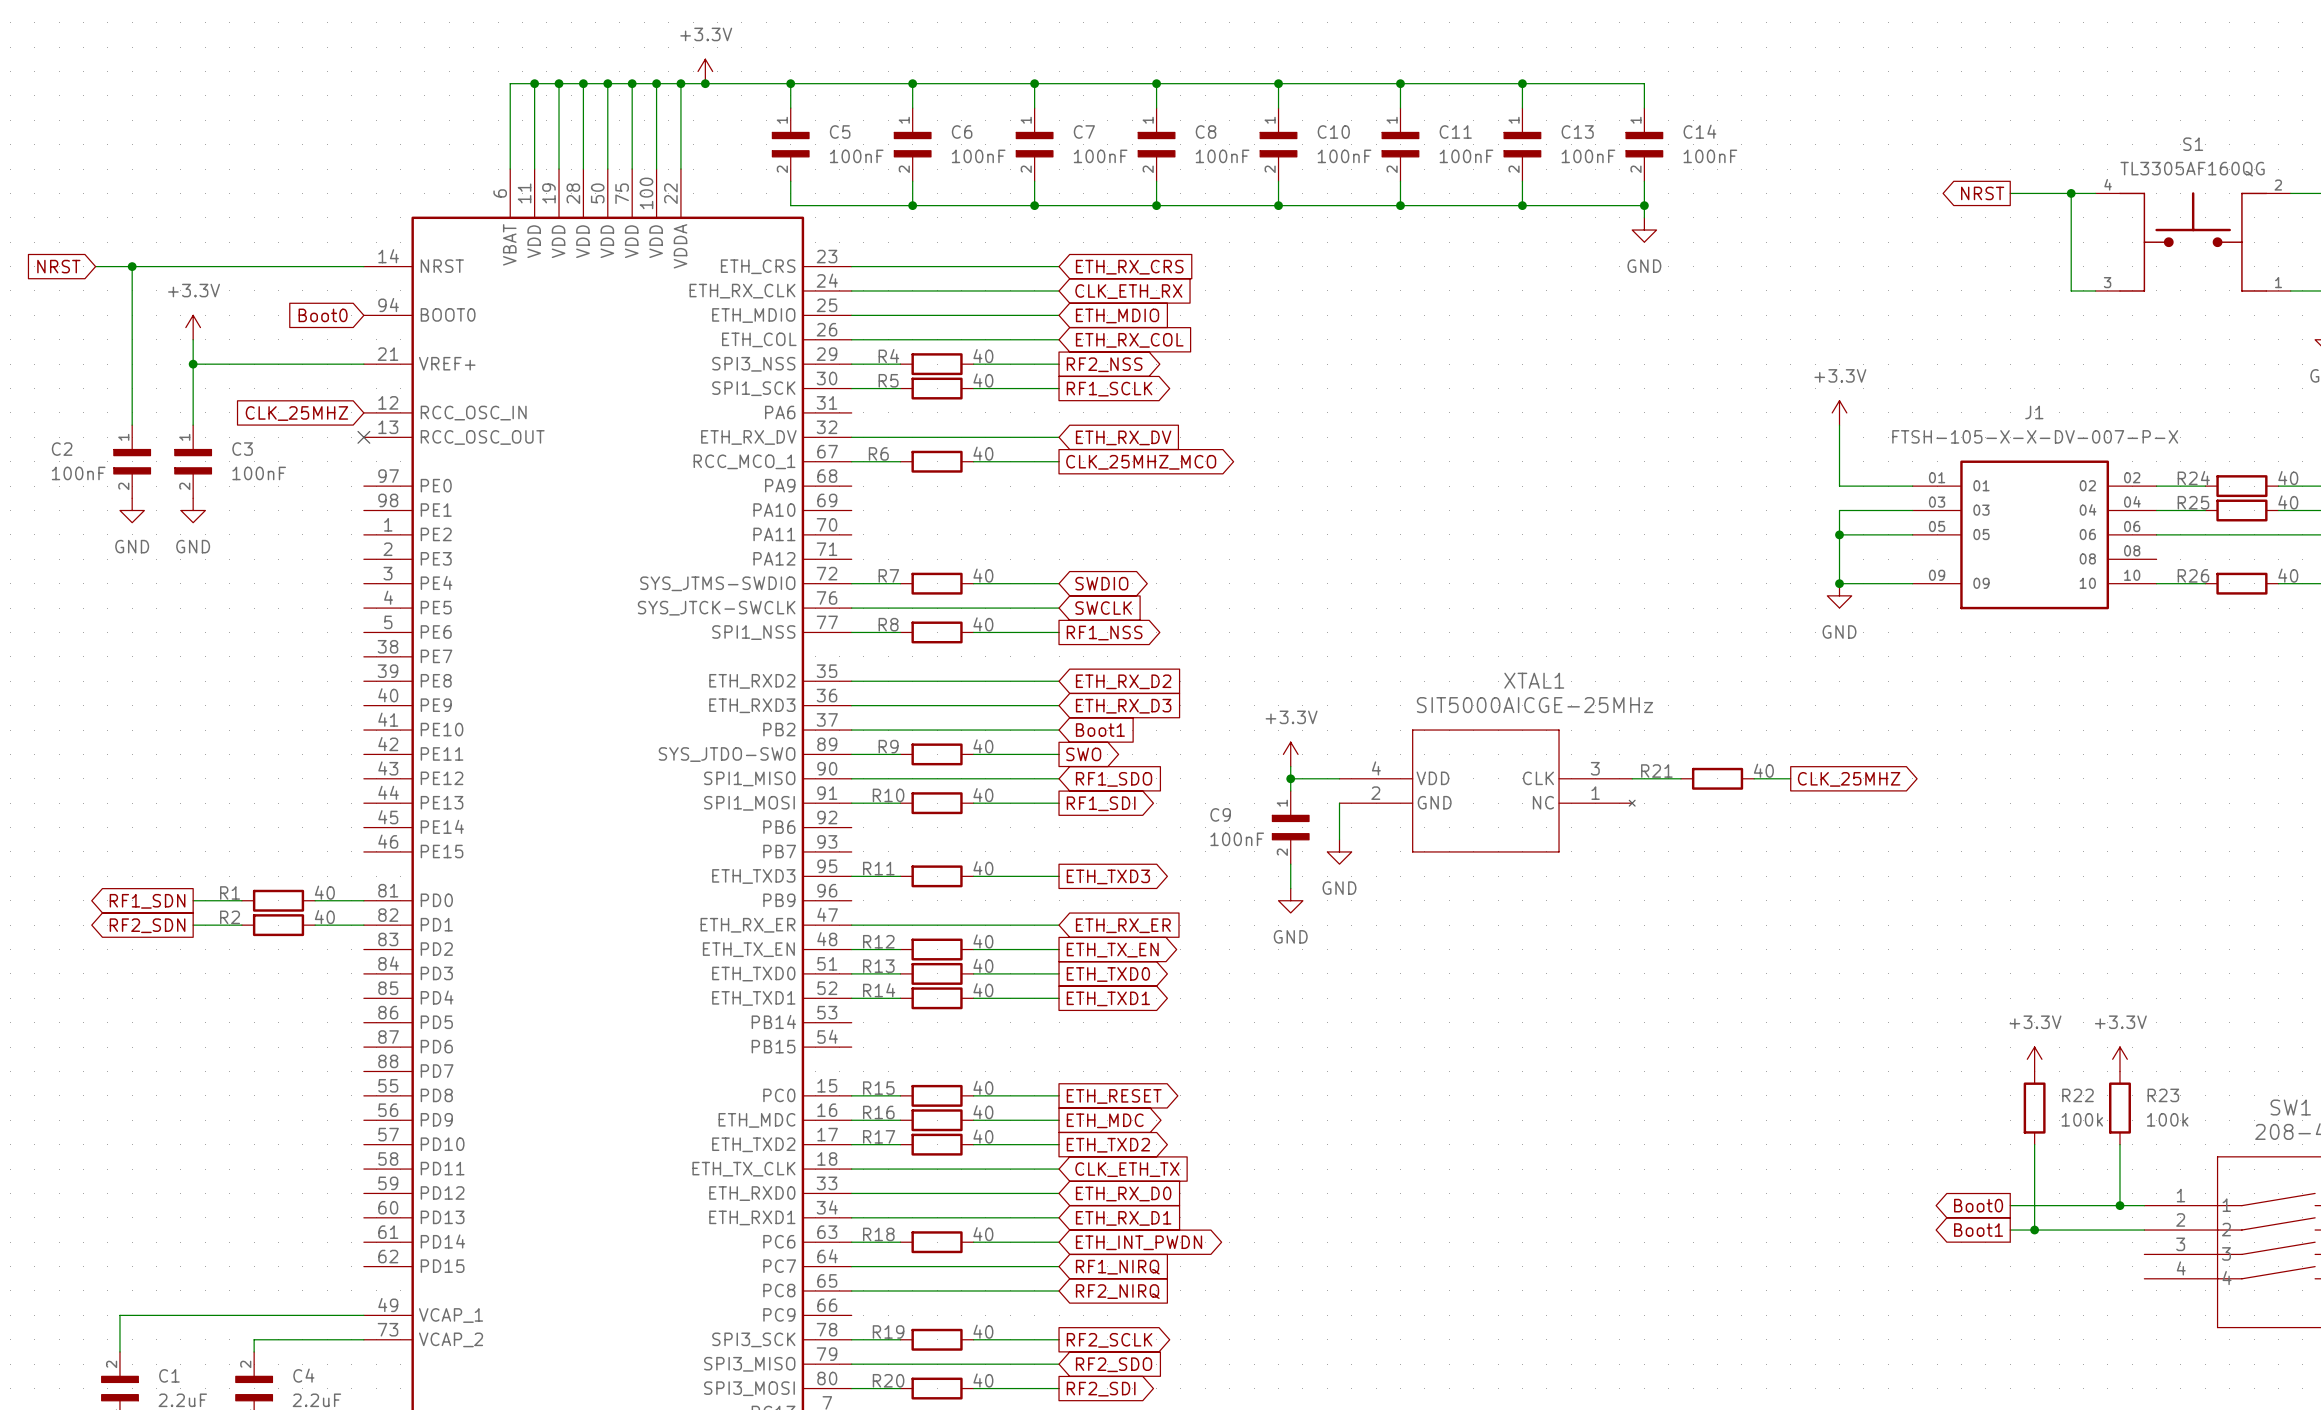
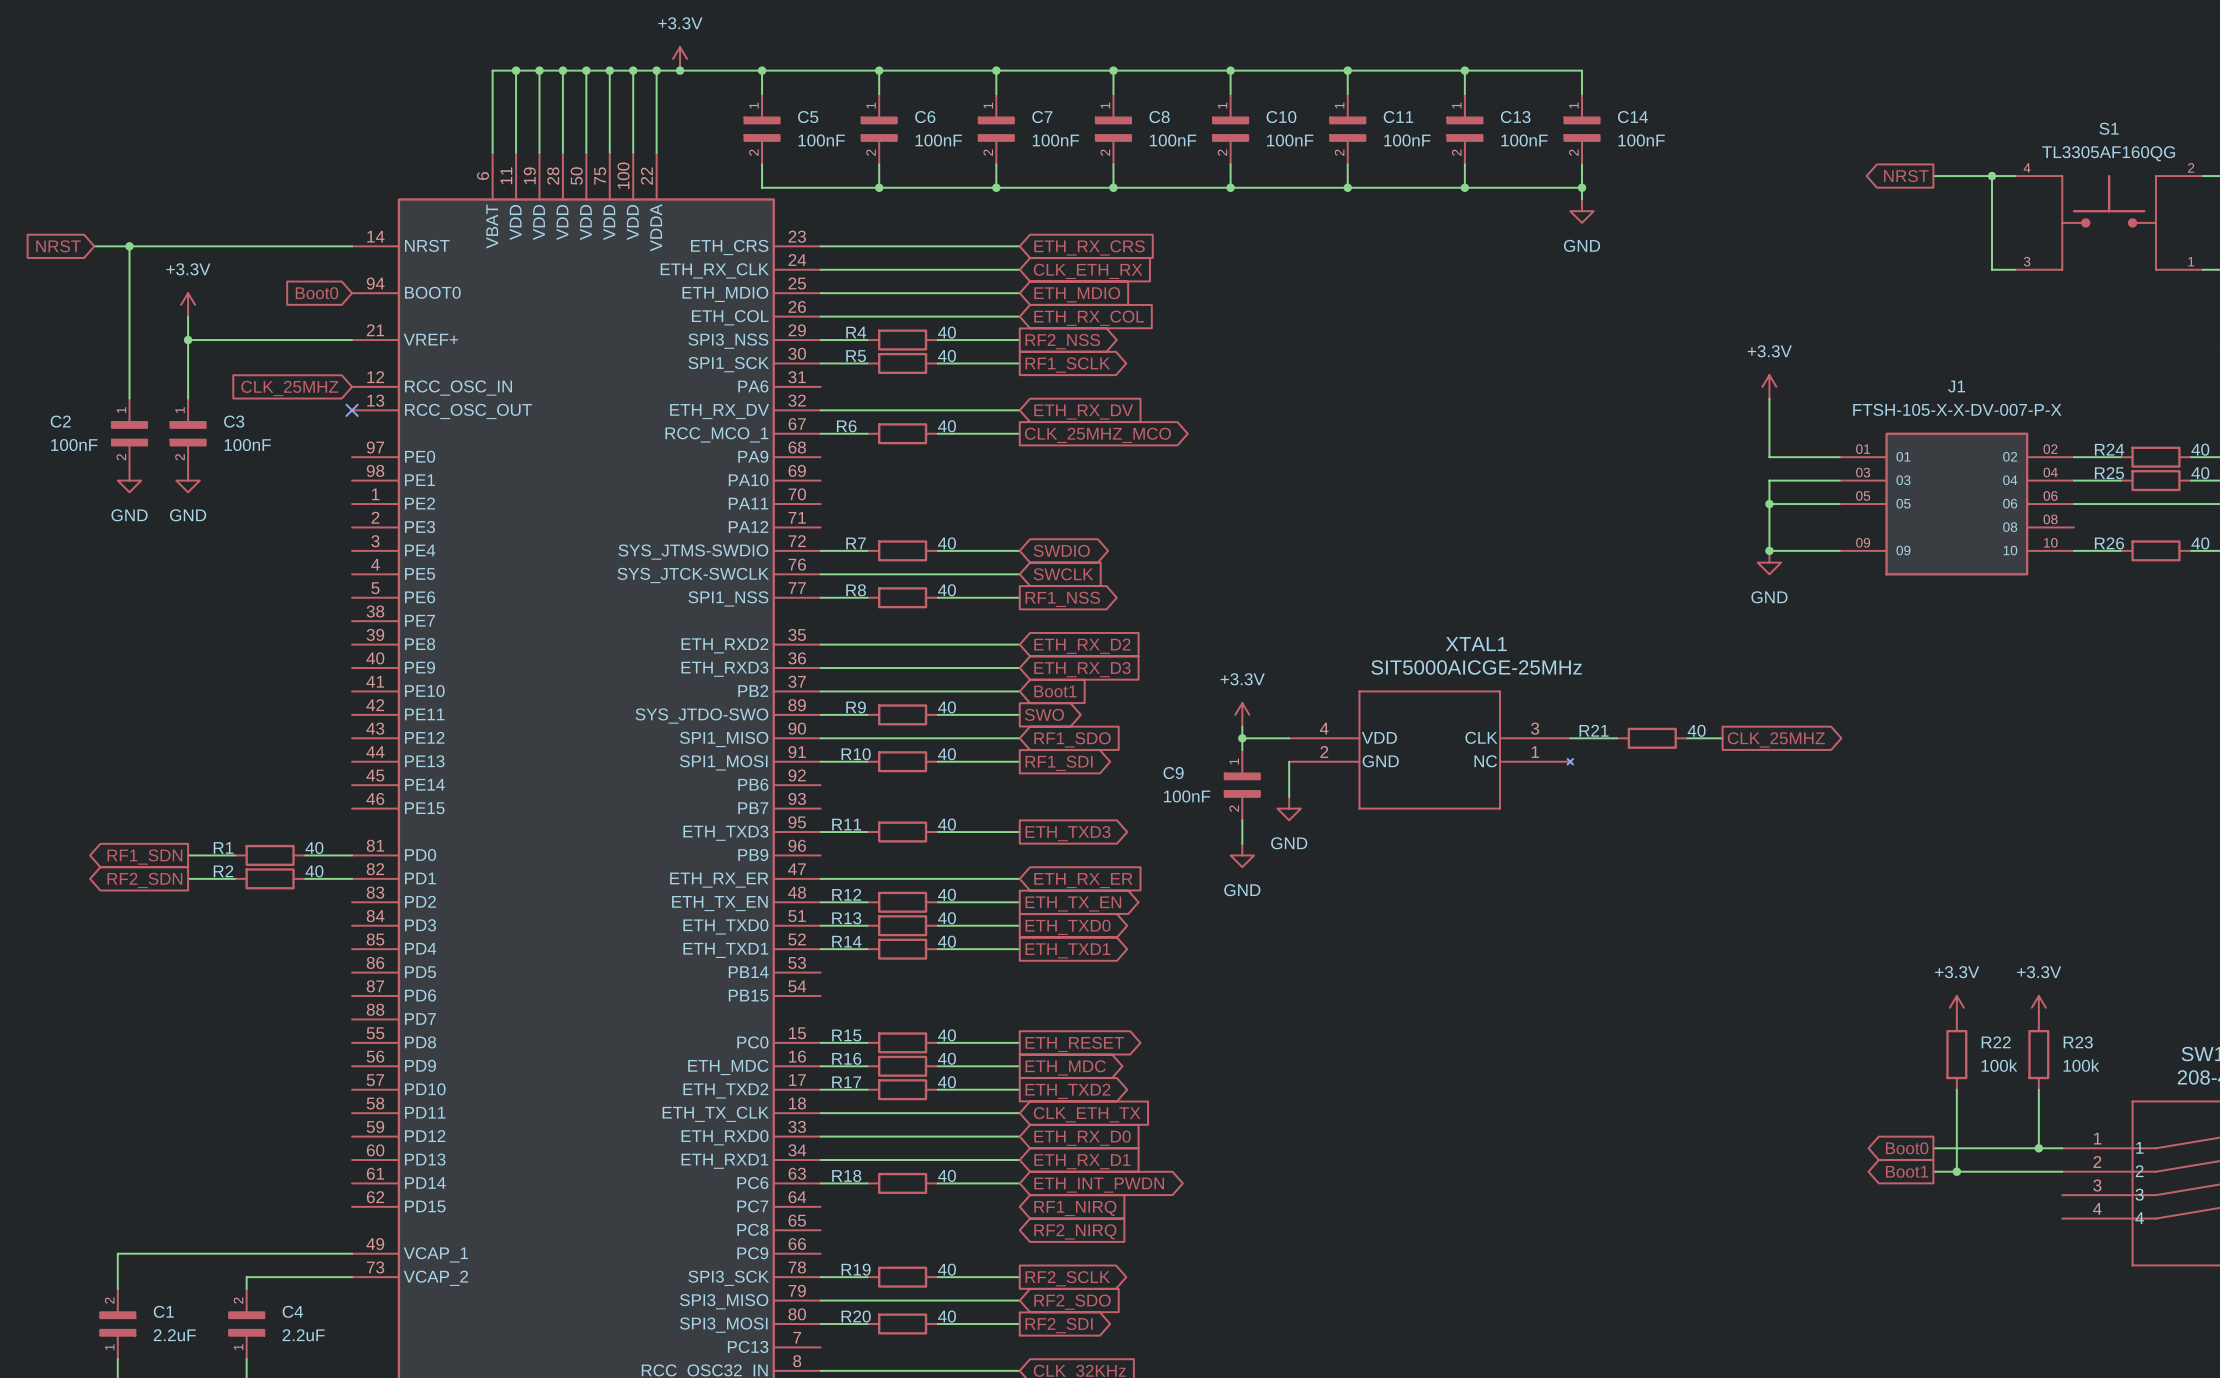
wire: (851, 1266) (1059, 1266) -> none
wire: (851, 1290) (1059, 1290) -> none

